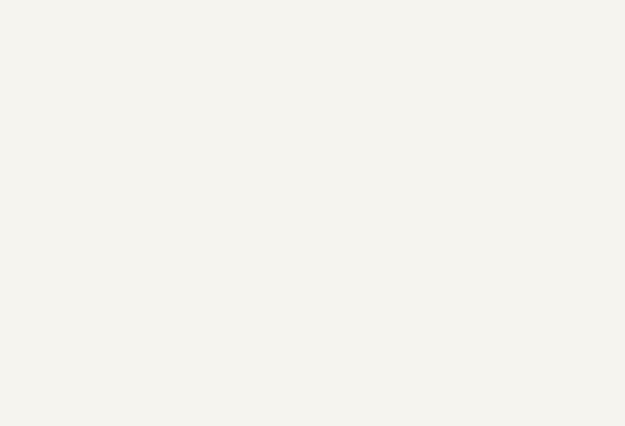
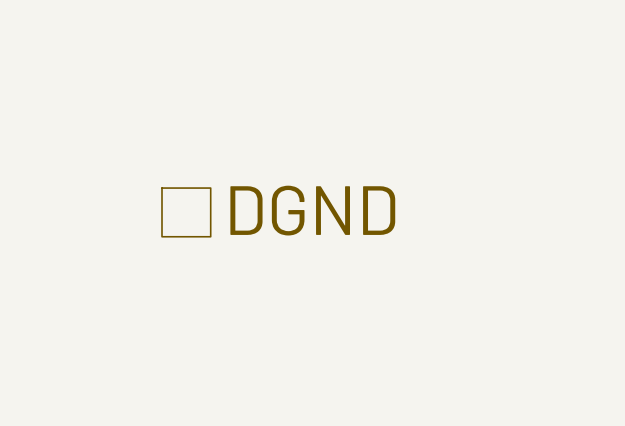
hierarchical label: none -> DGND (312, 210)

